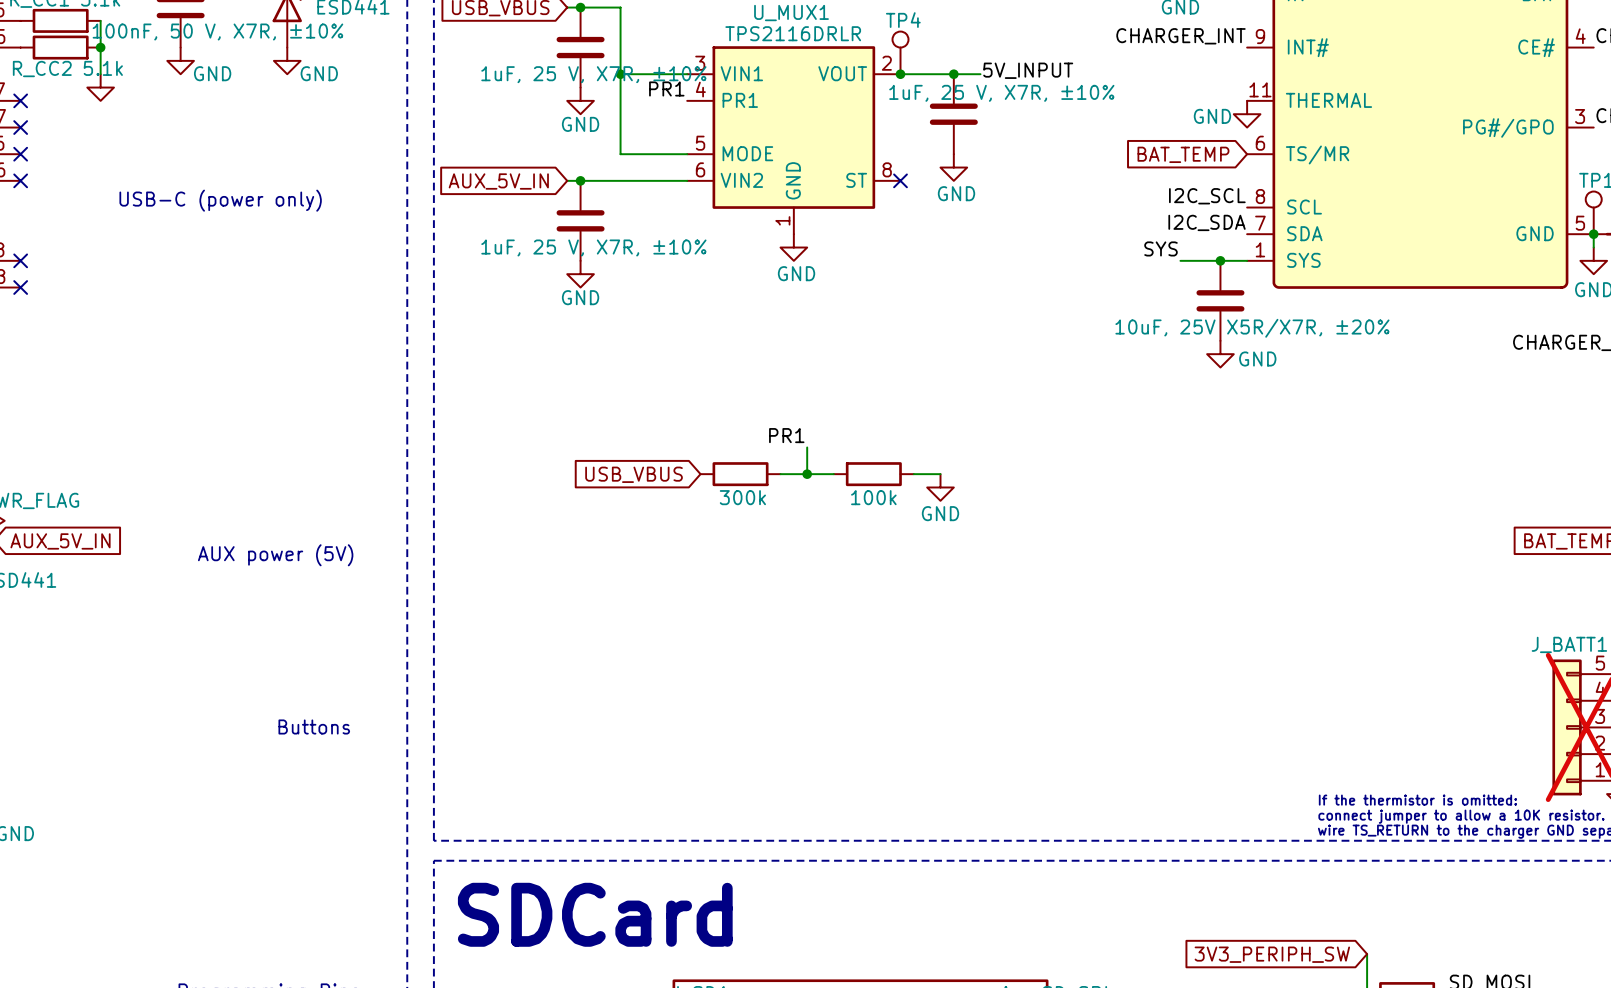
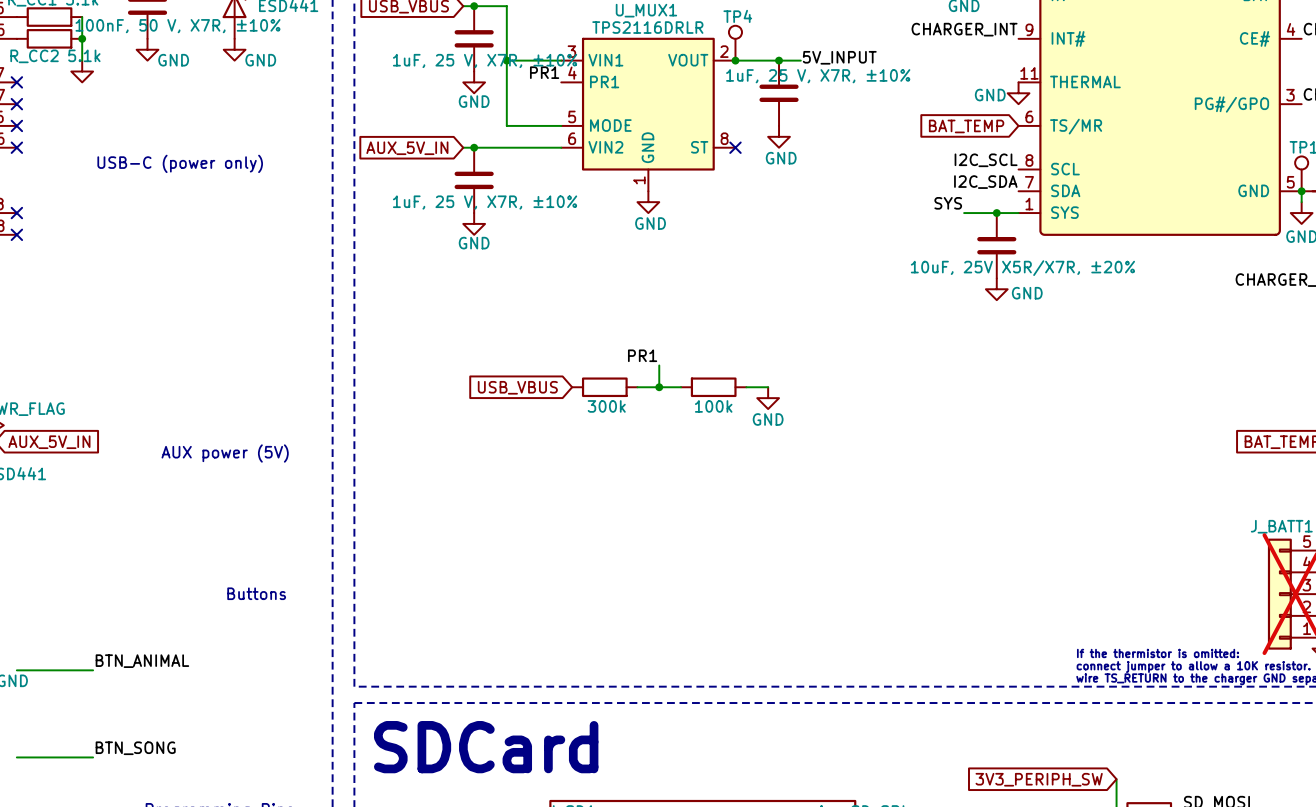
label: none -> BTN_ANIMAL (142, 661)
wire: none -> (16, 670) (93, 670)
label: none -> BTN_SONG (135, 748)
wire: none -> (16, 757) (93, 757)

